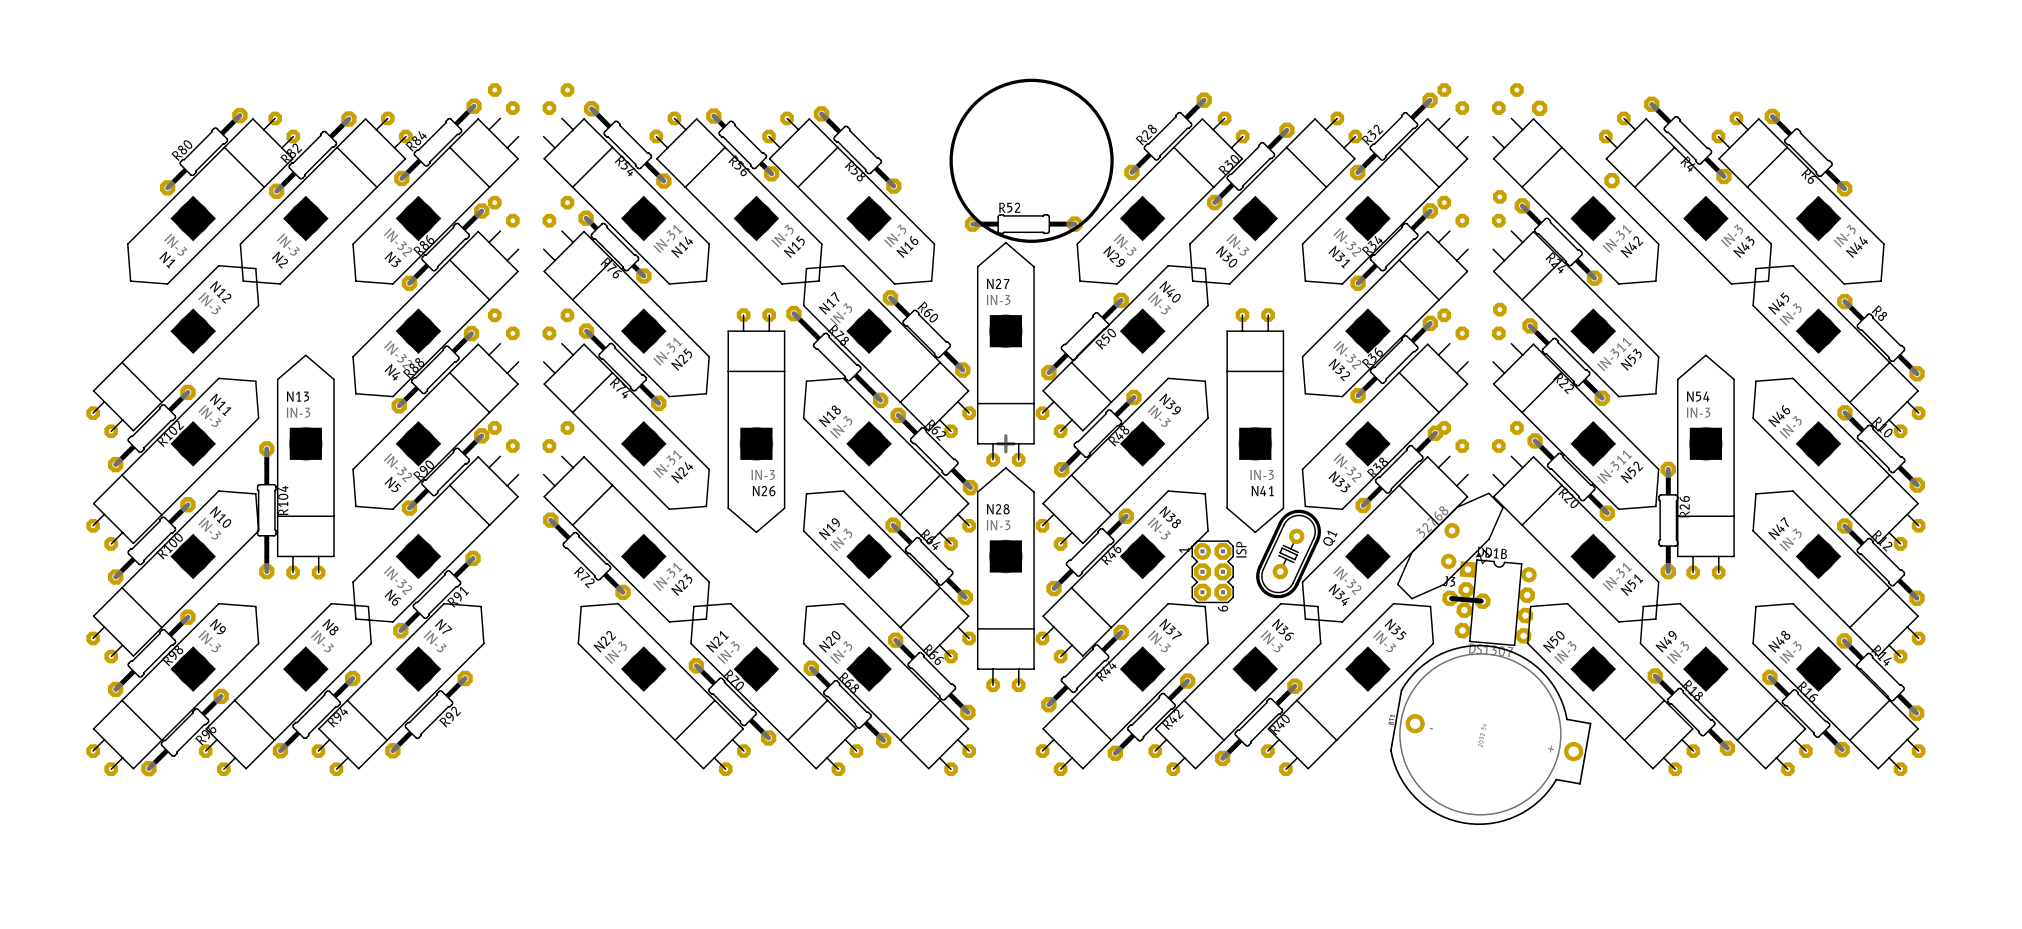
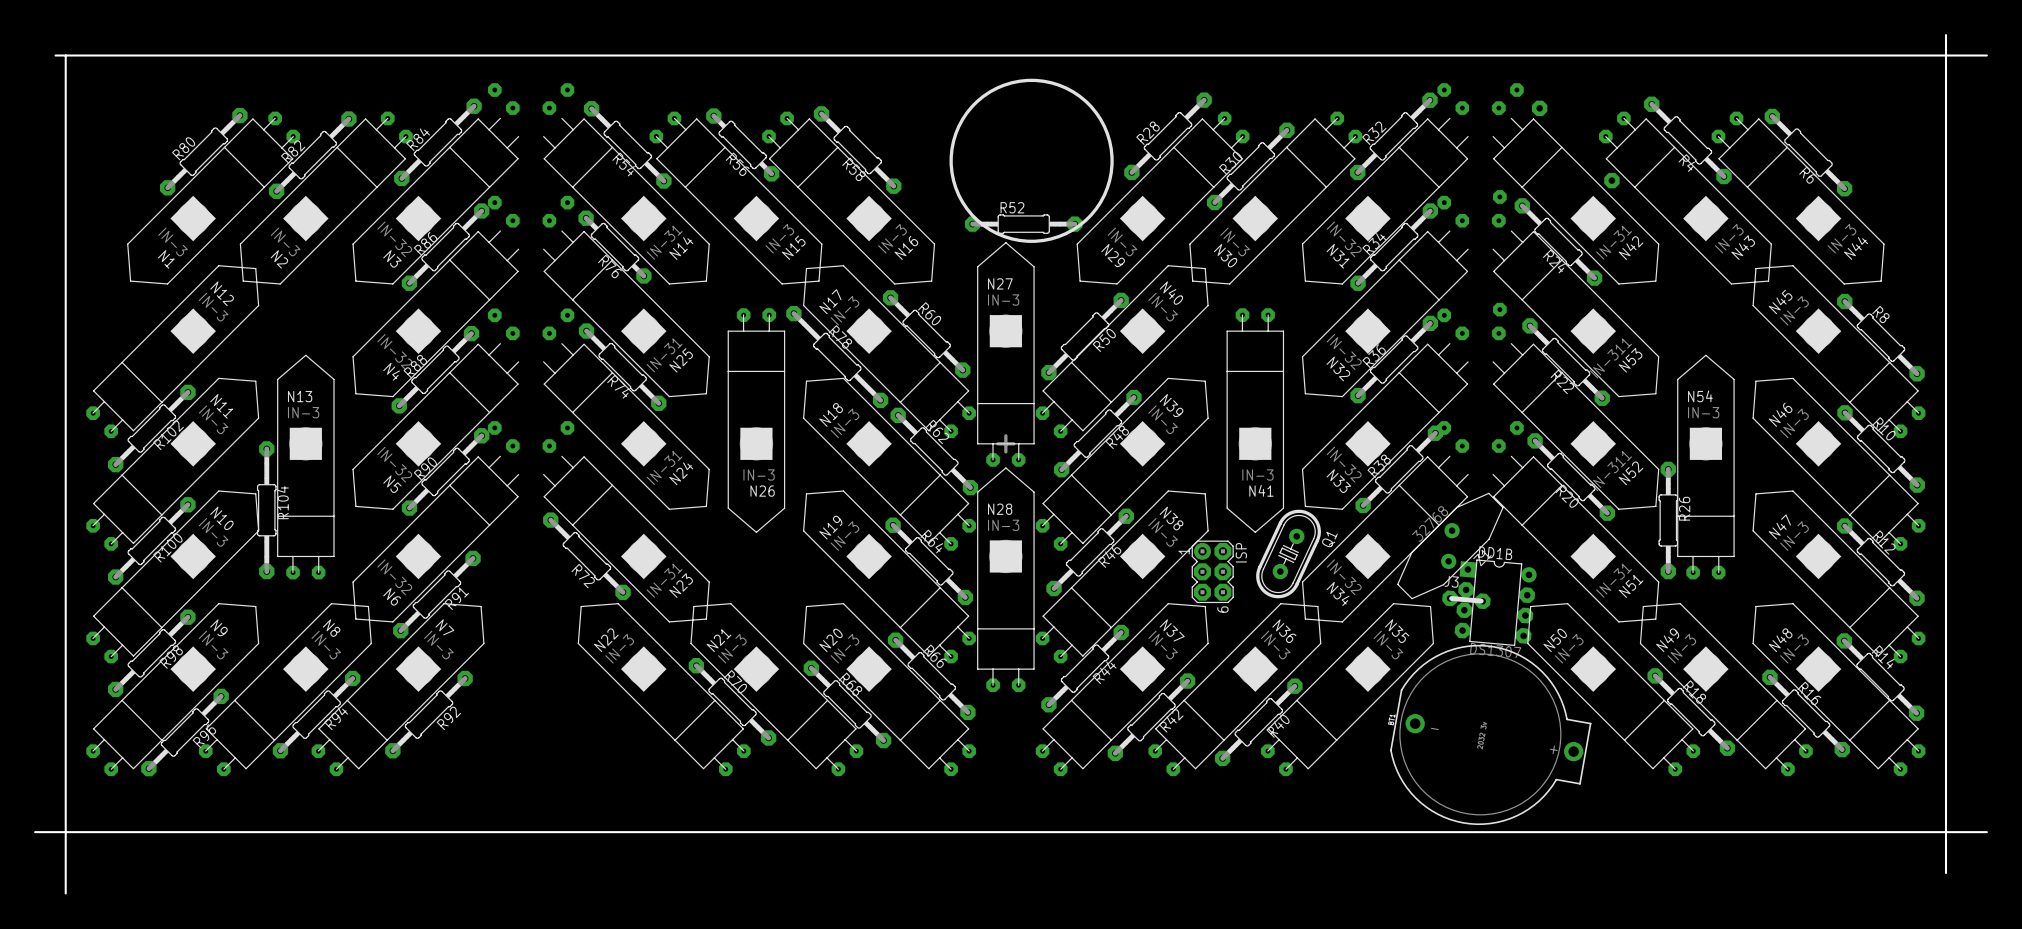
board edge: none -> (1946, 35) (1946, 873)
board edge: none -> (55, 55) (1986, 55)
board edge: none -> (65, 55) (65, 893)
board edge: none -> (35, 832) (1986, 832)

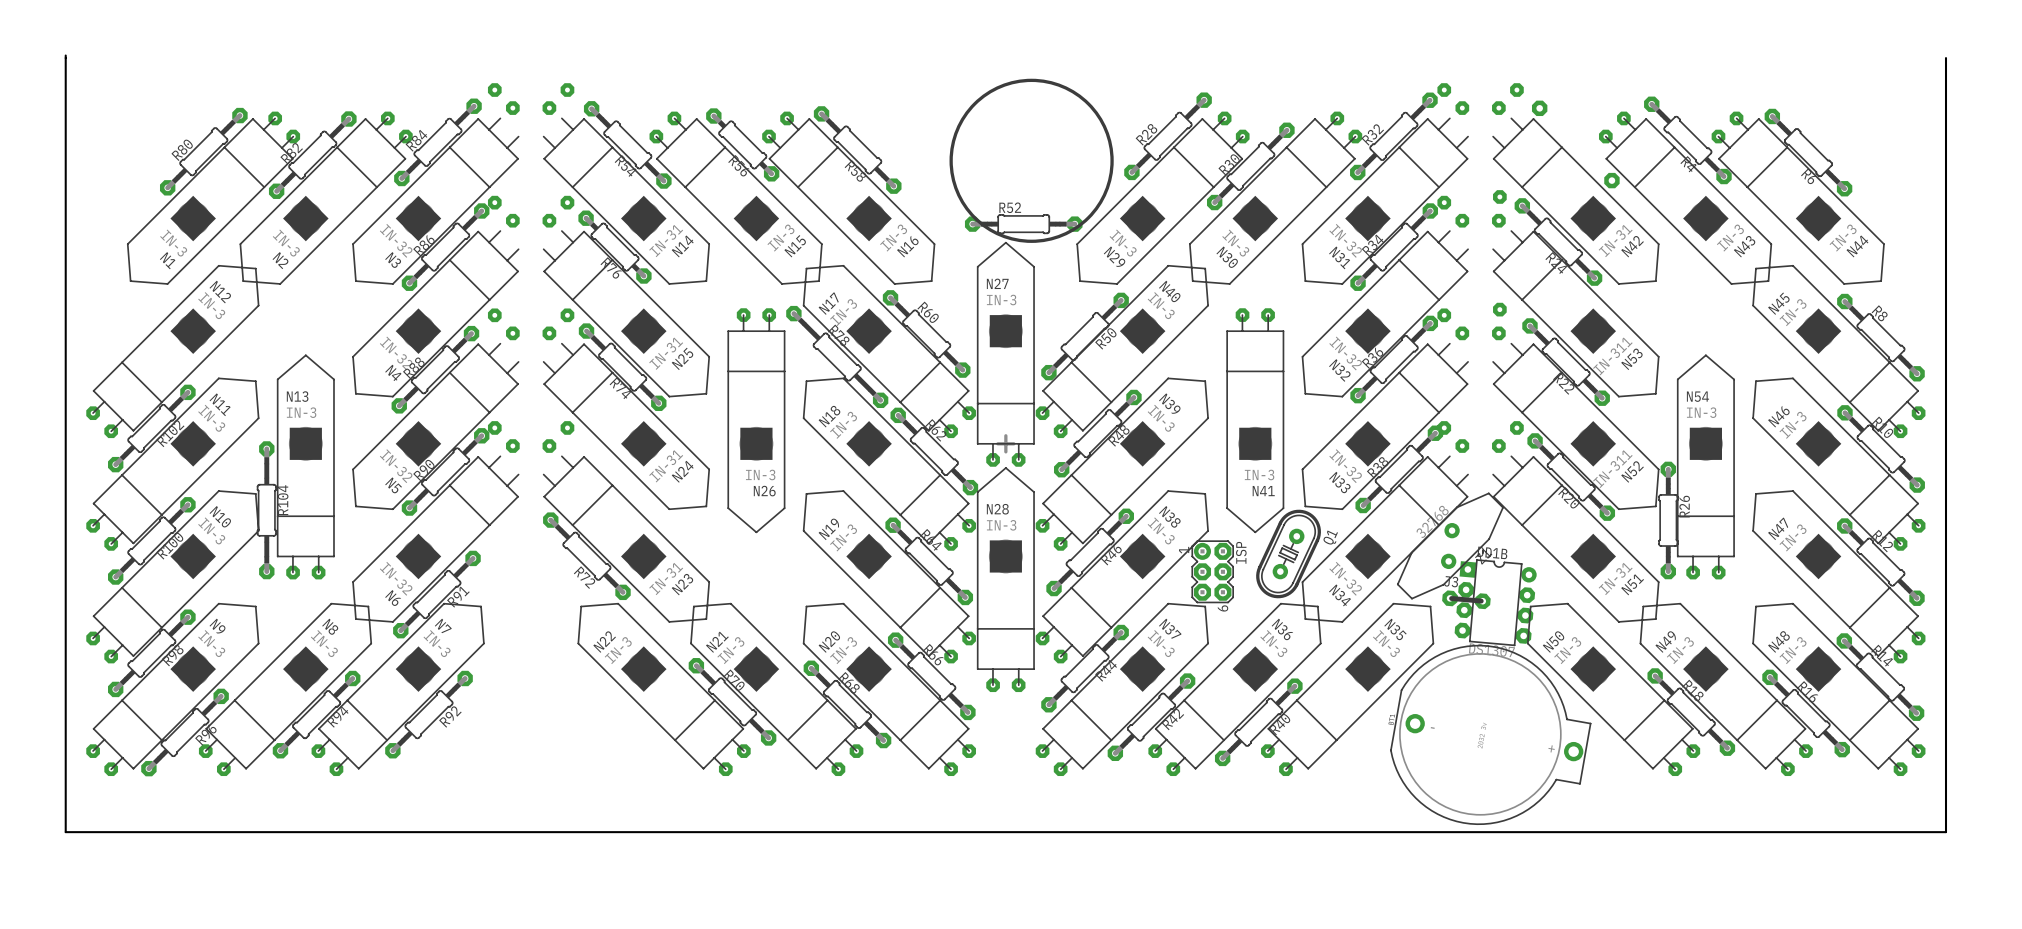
board edge: (1946, 35) (1946, 58) -> none
board edge: (55, 55) (1986, 55) -> none
board edge: (35, 832) (65, 832) (65, 893) -> none
board edge: (1986, 832) (1946, 832) (1946, 873) -> none

